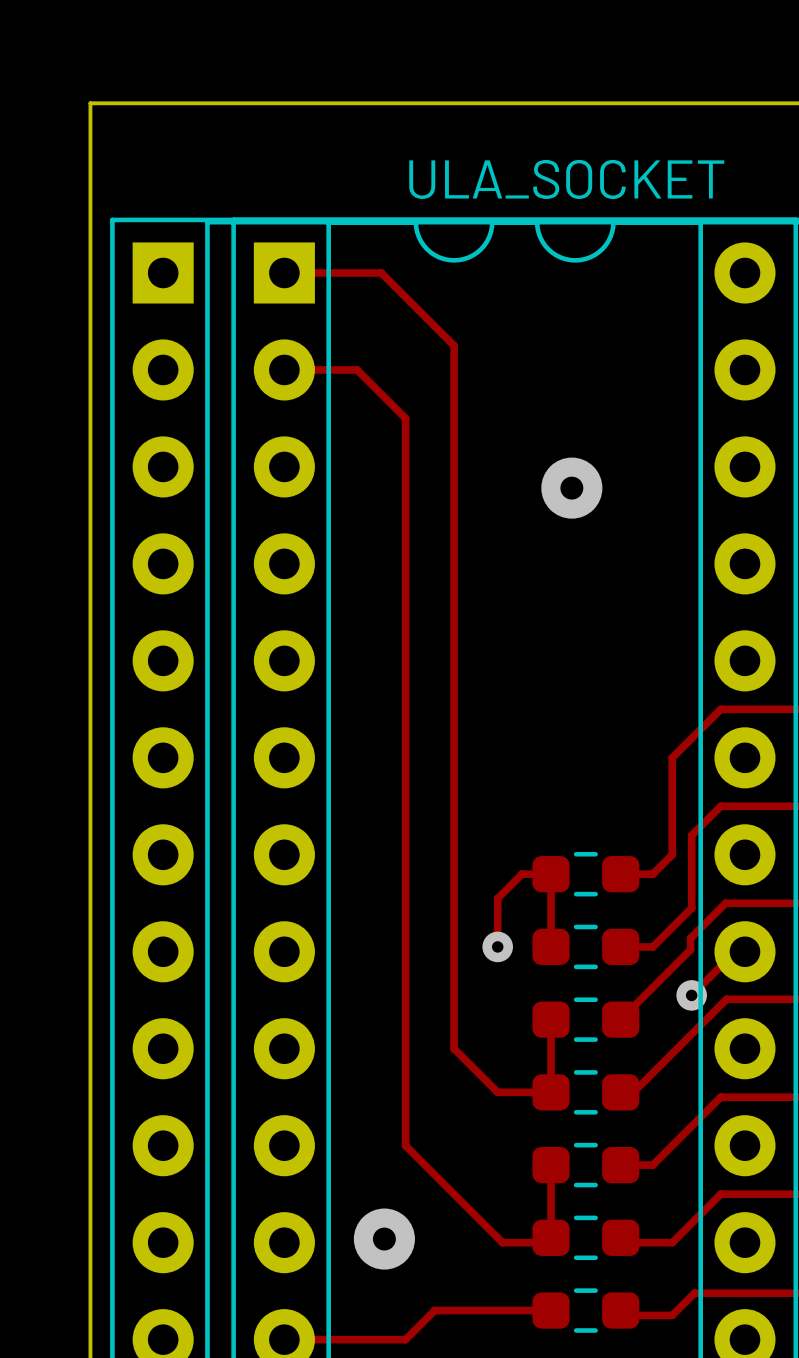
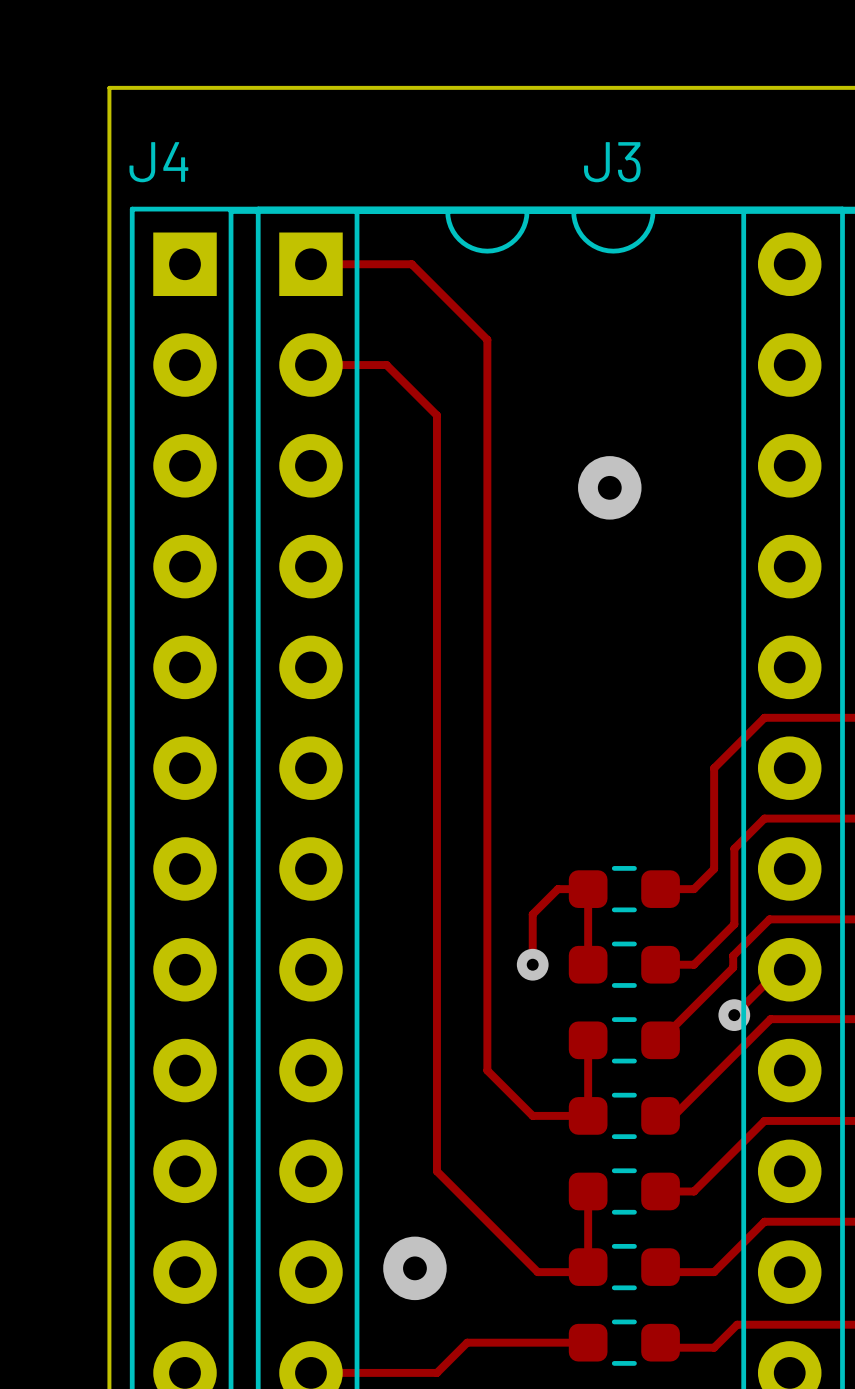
J4 name: none -> J4 (158, 162)
J3 name: none -> J3 (612, 162)
J3 value: ULA_SOCKET (566, 179) -> none

